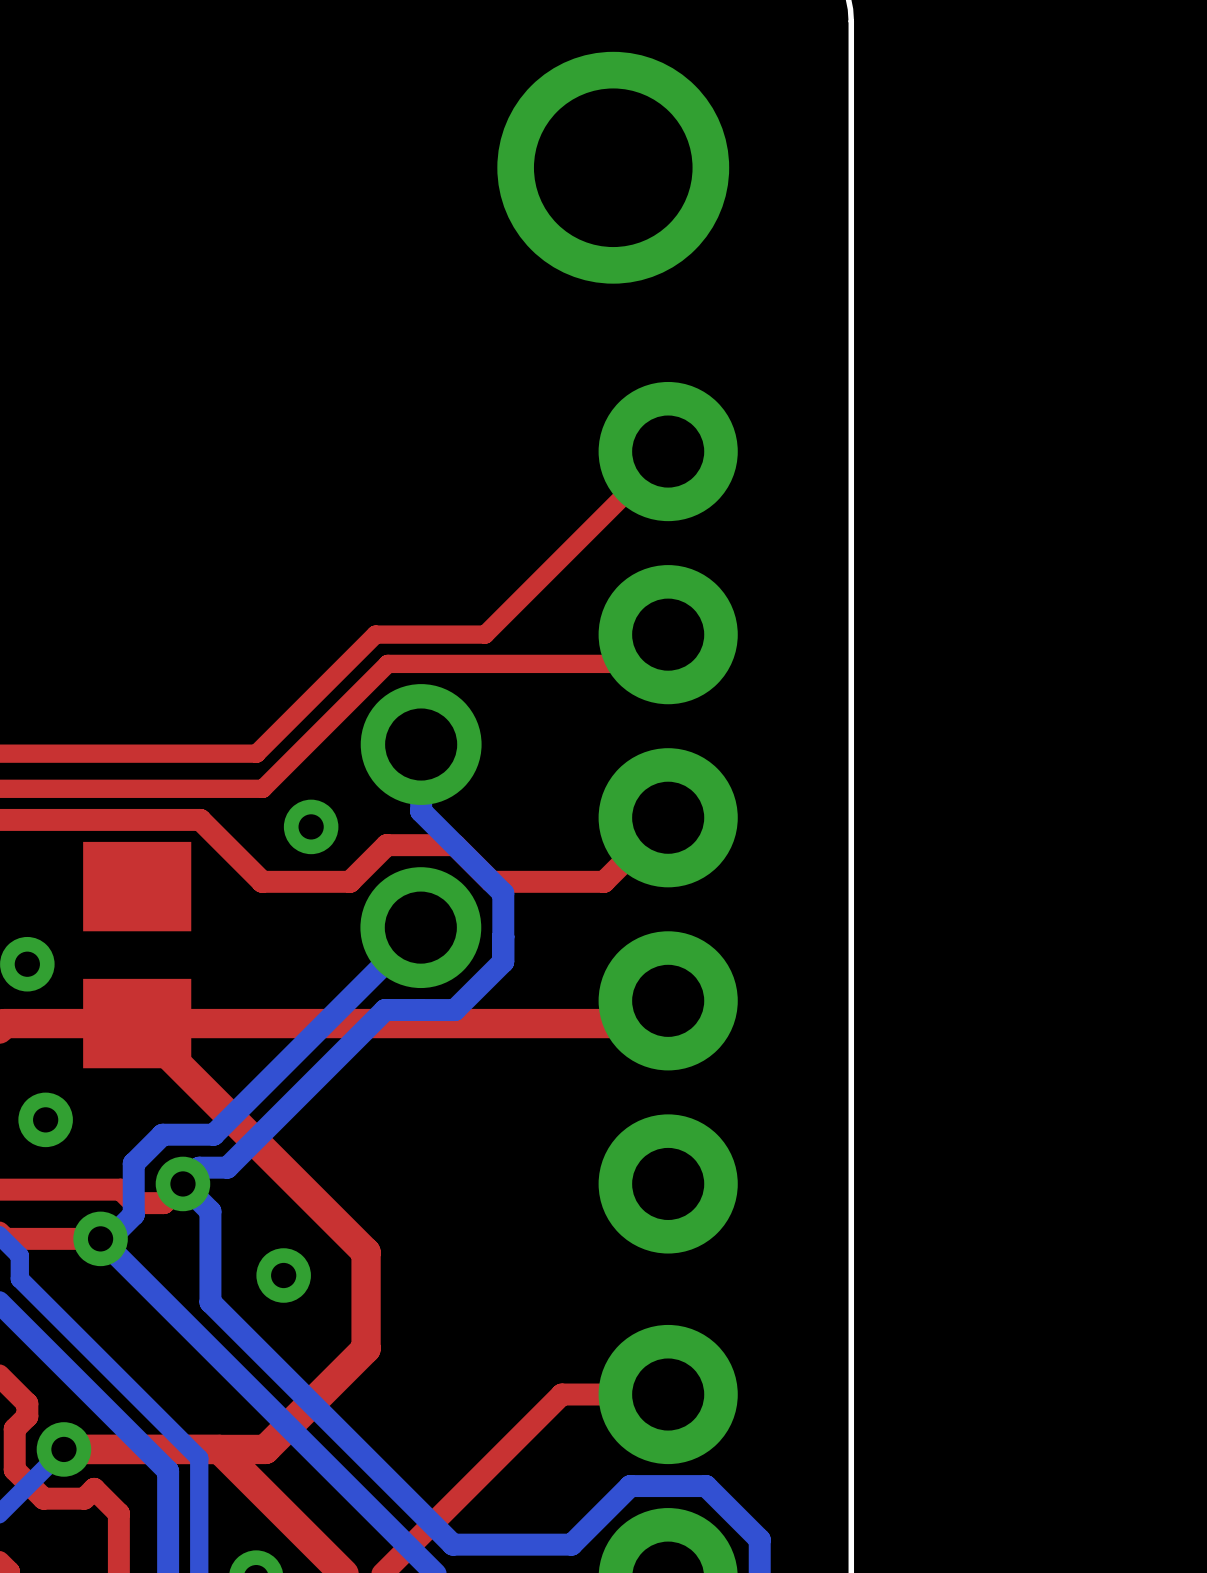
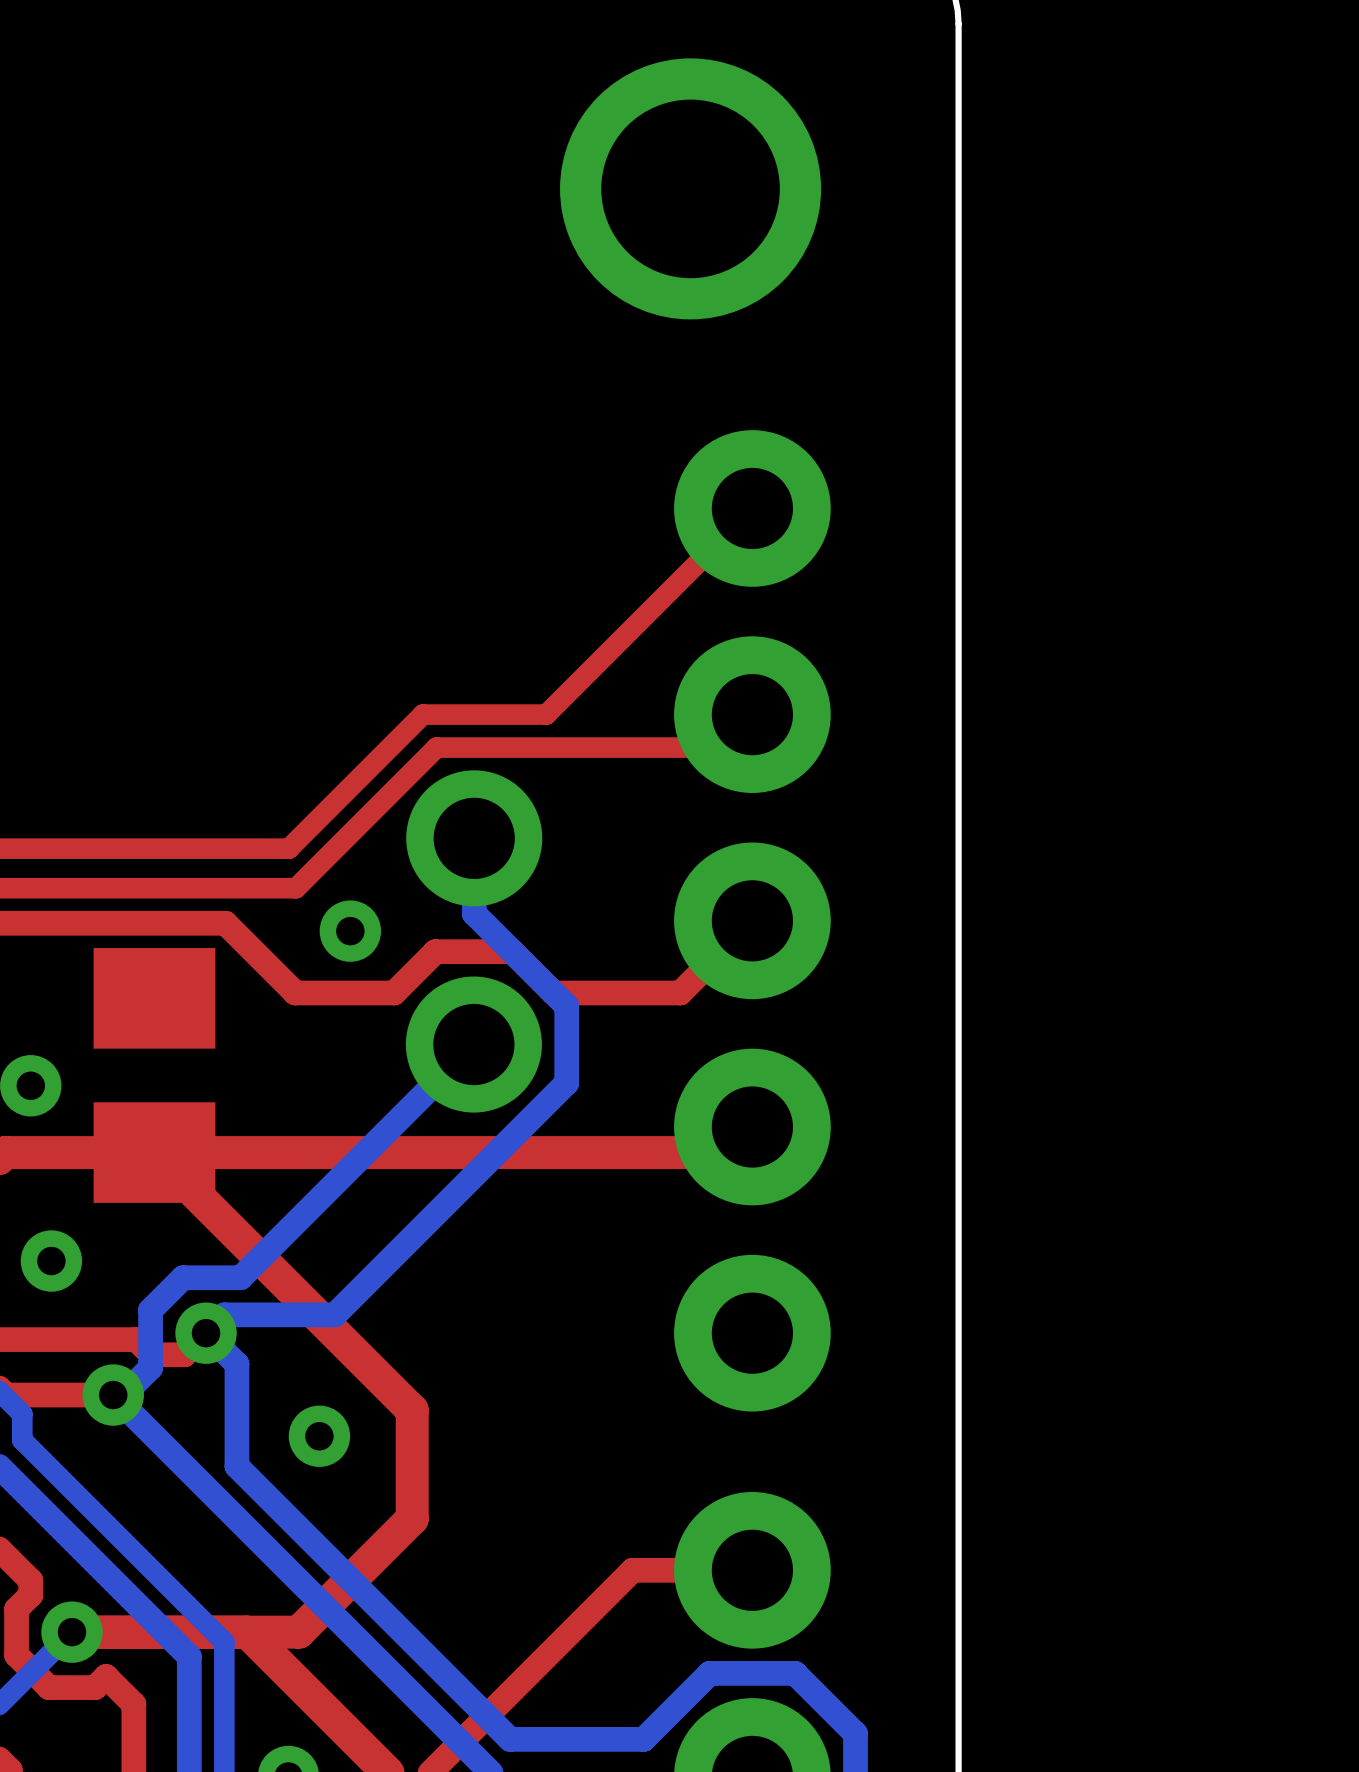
bottom track: (503, 936) (503, 961) (454, 1010) (385, 1010) (227, 1167) -> (566, 1082) (334, 1314) (256, 1314)

